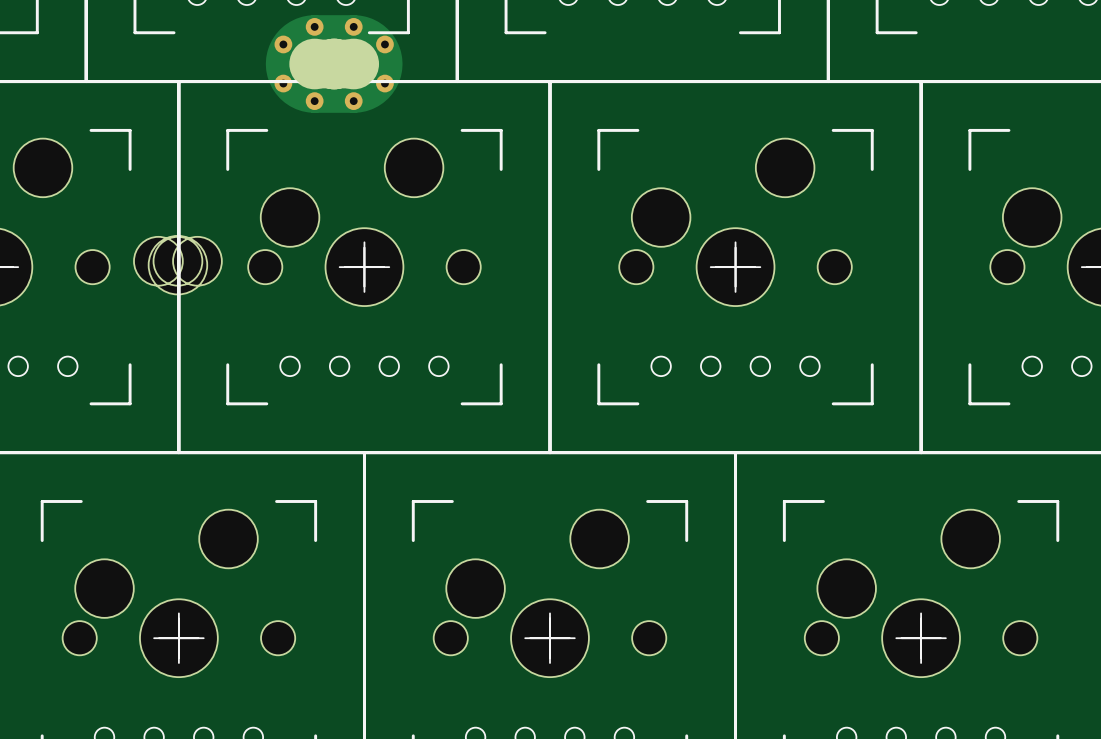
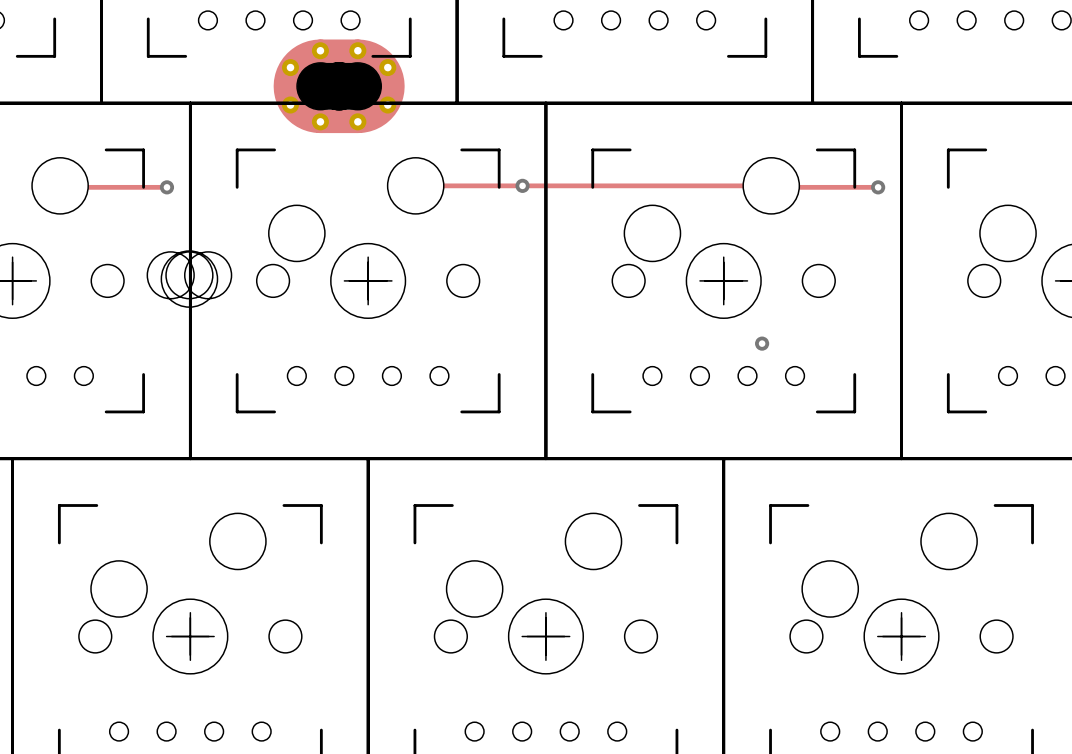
track: none -> (54, 185) (166, 187)
track: none -> (415, 185) (878, 187)
via: none -> (522, 185)
via: none -> (166, 187)
via: none -> (878, 187)
via: none -> (762, 343)

